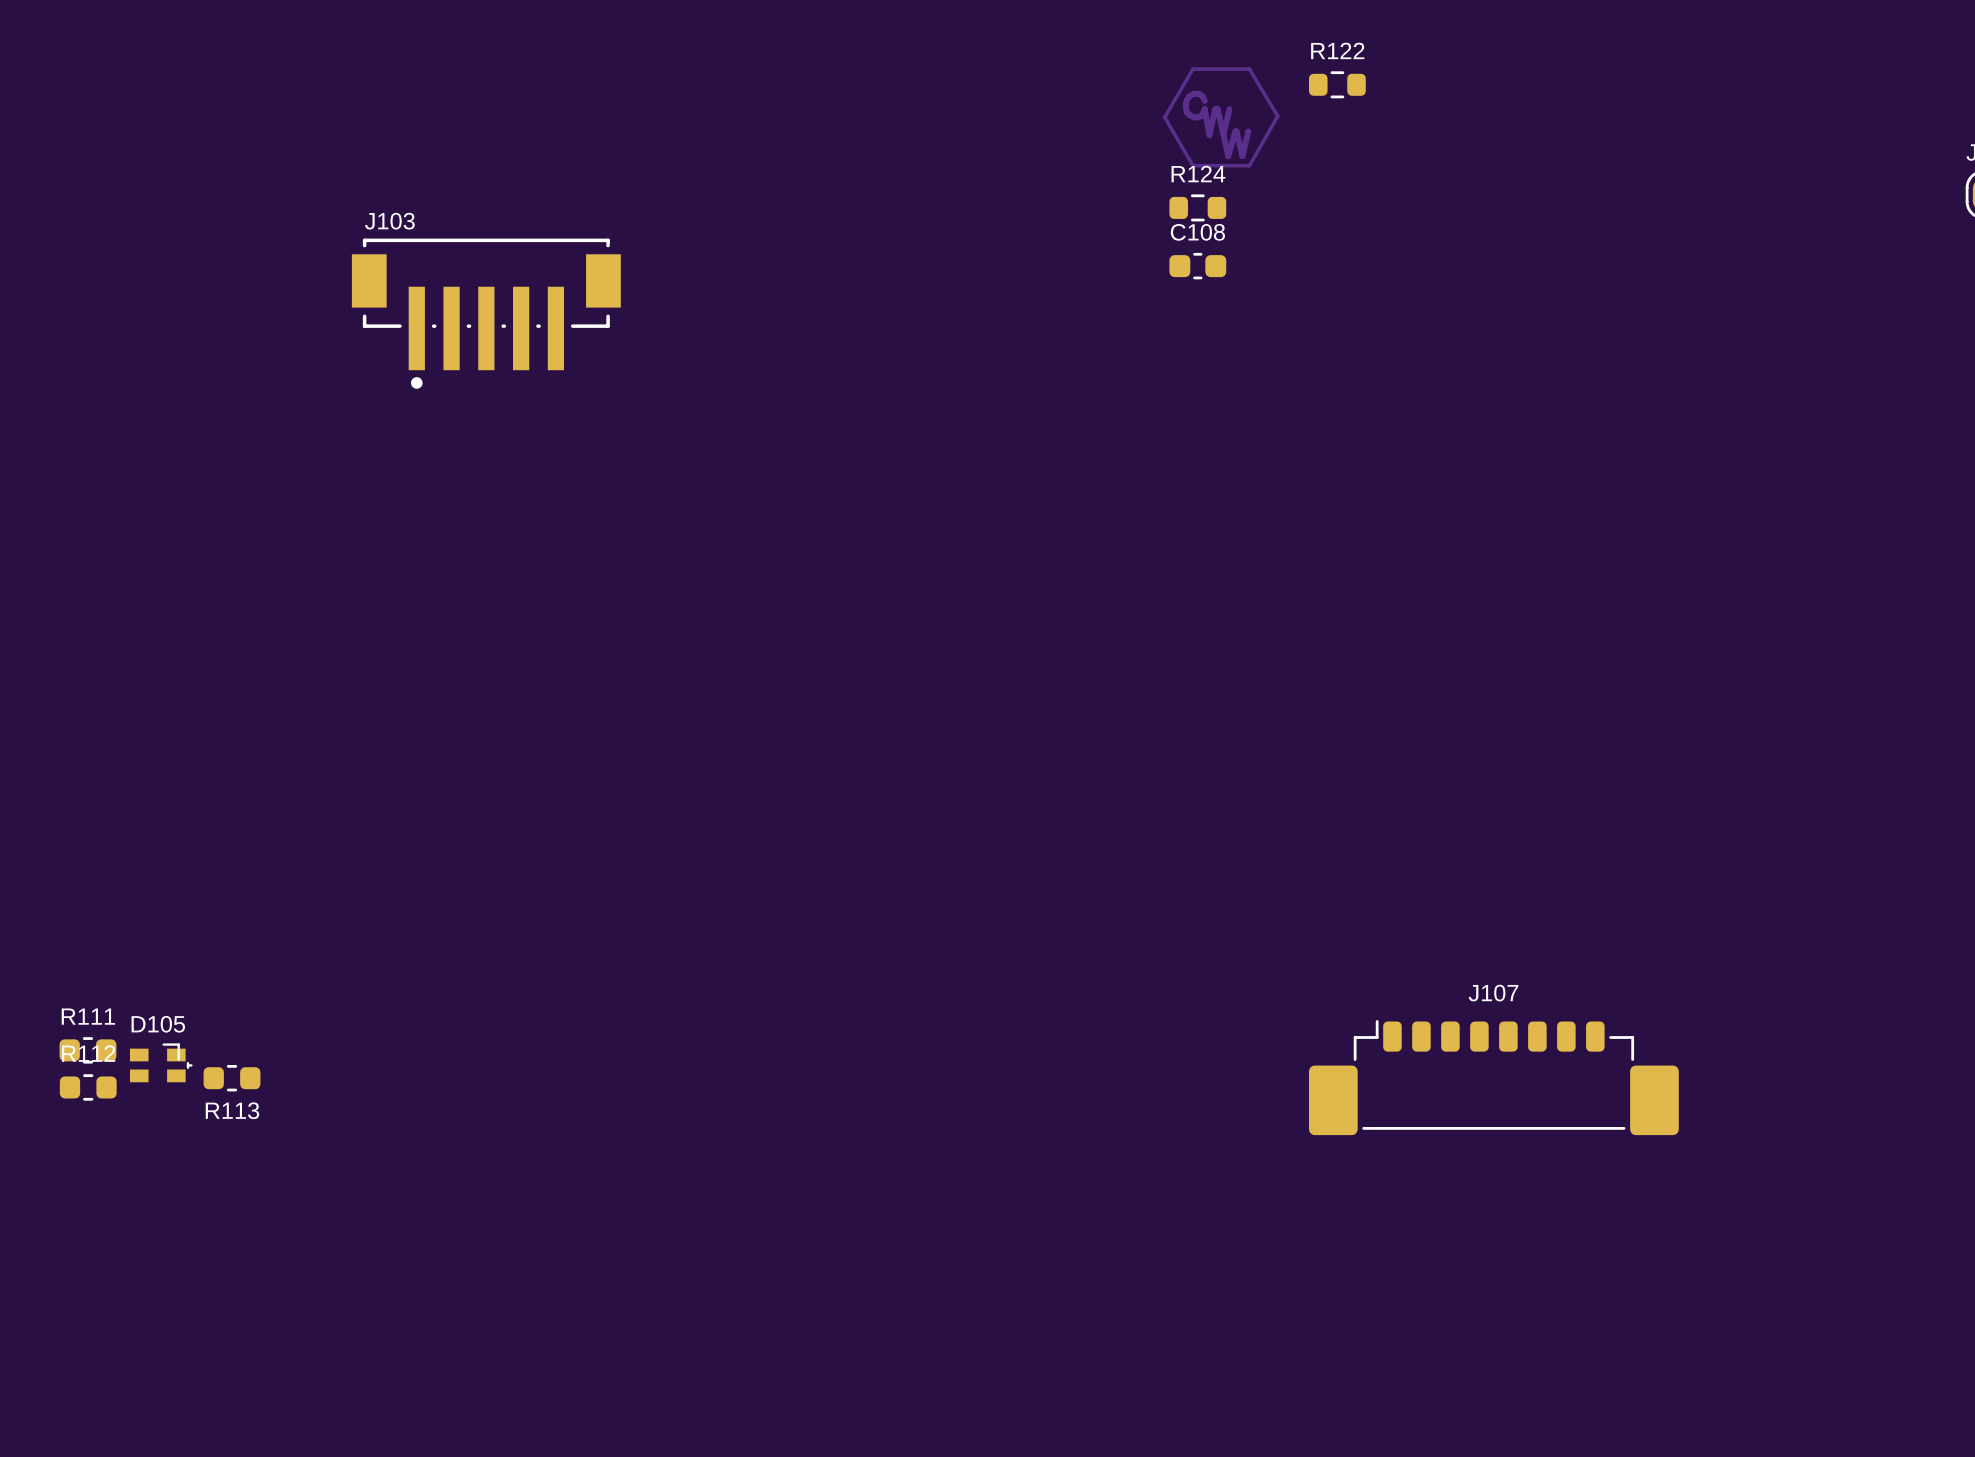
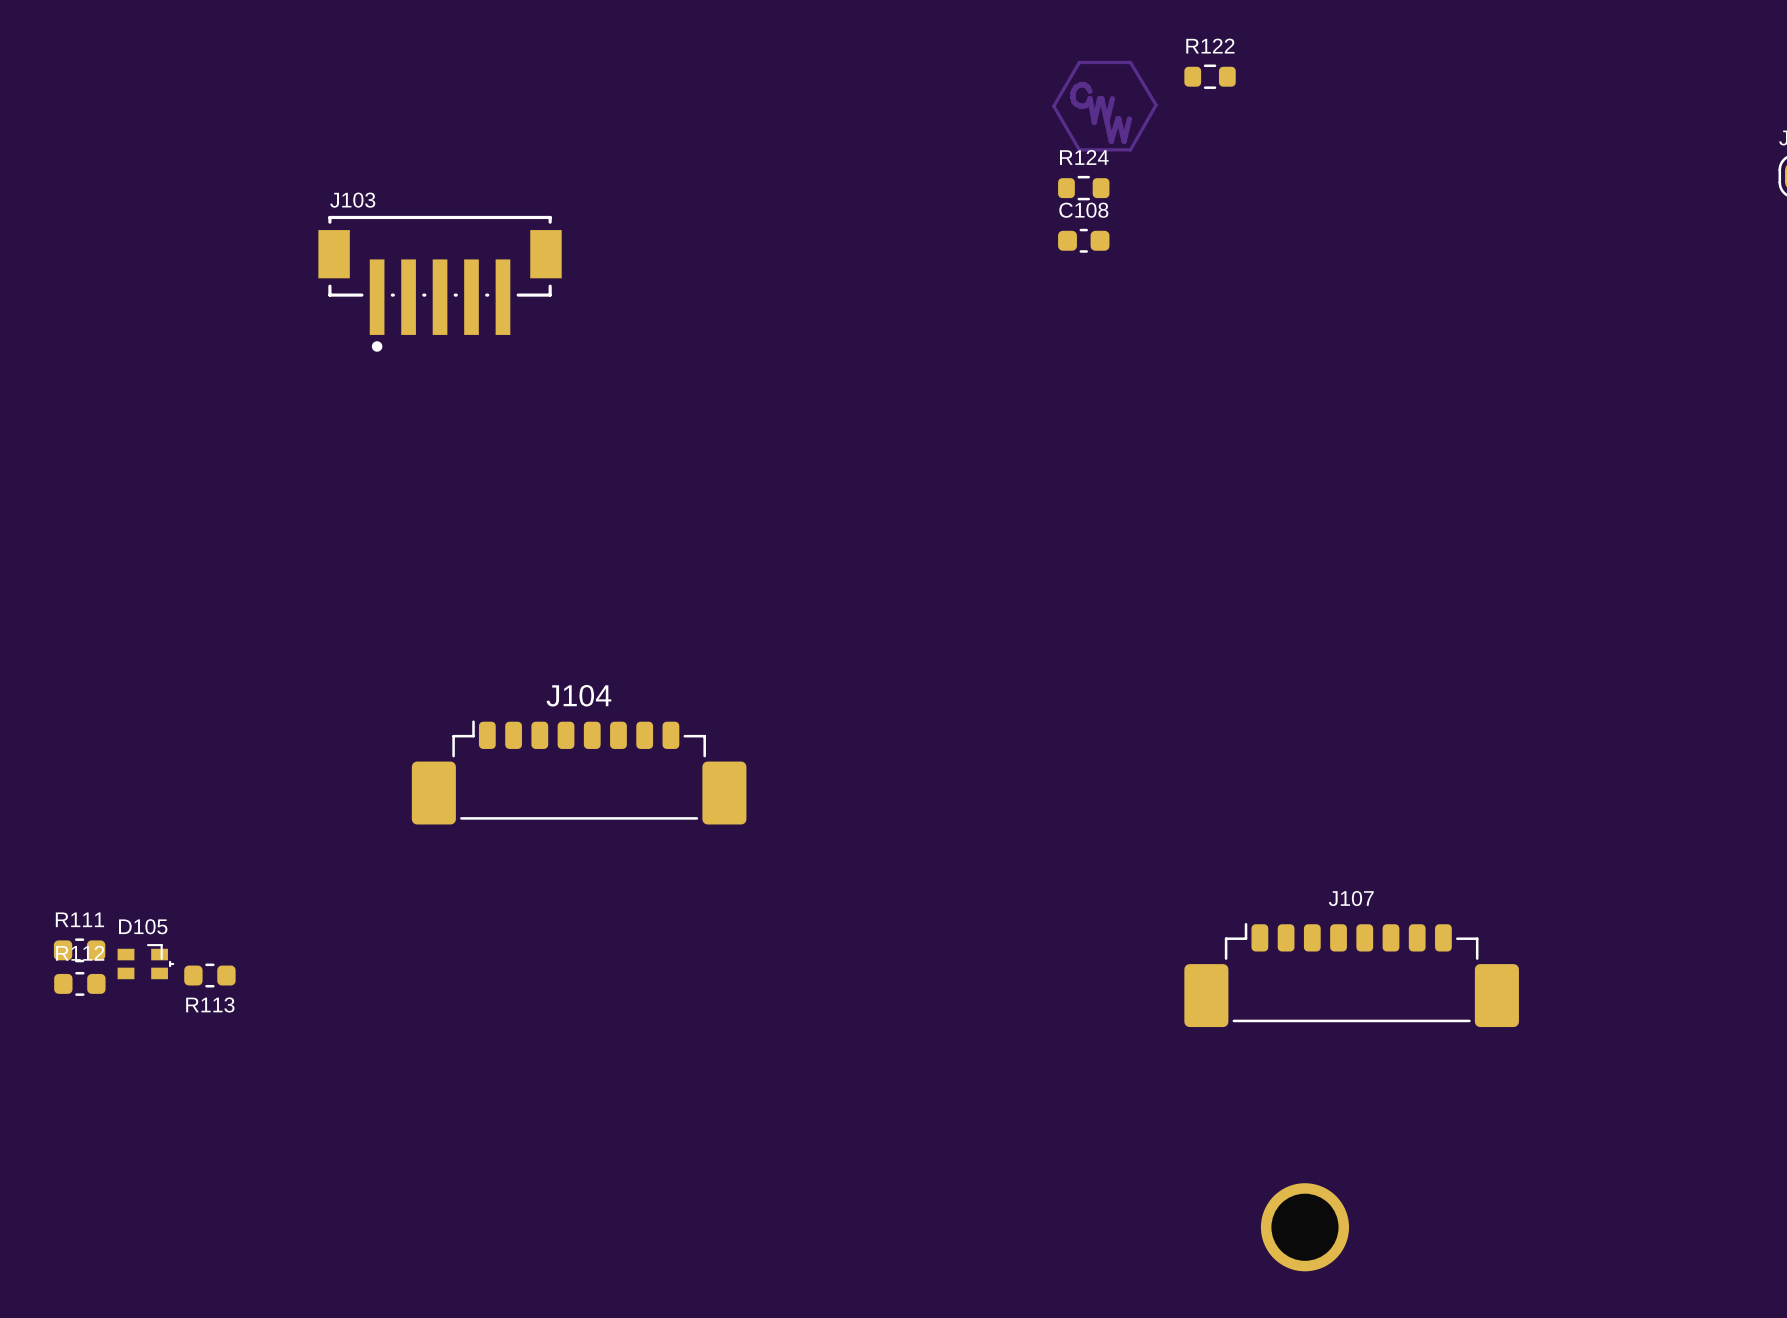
J104: none -> (579, 772)
part: none -> (1304, 1227)

